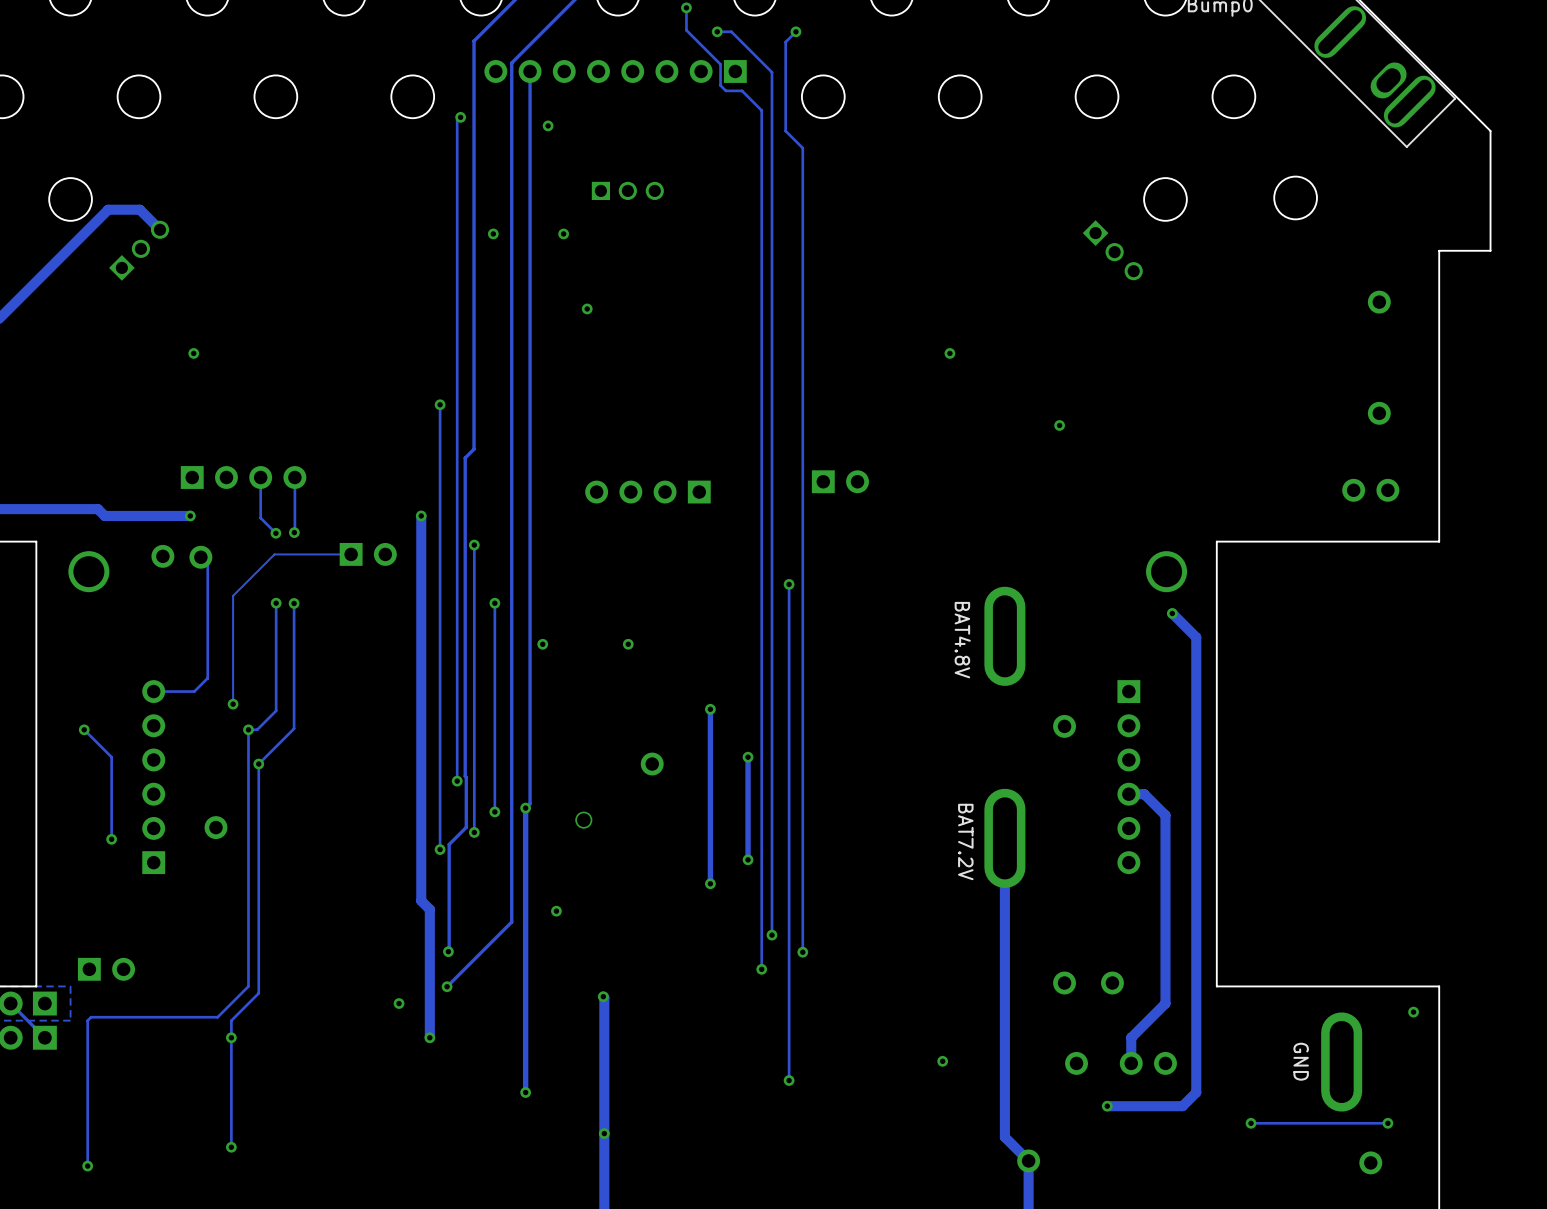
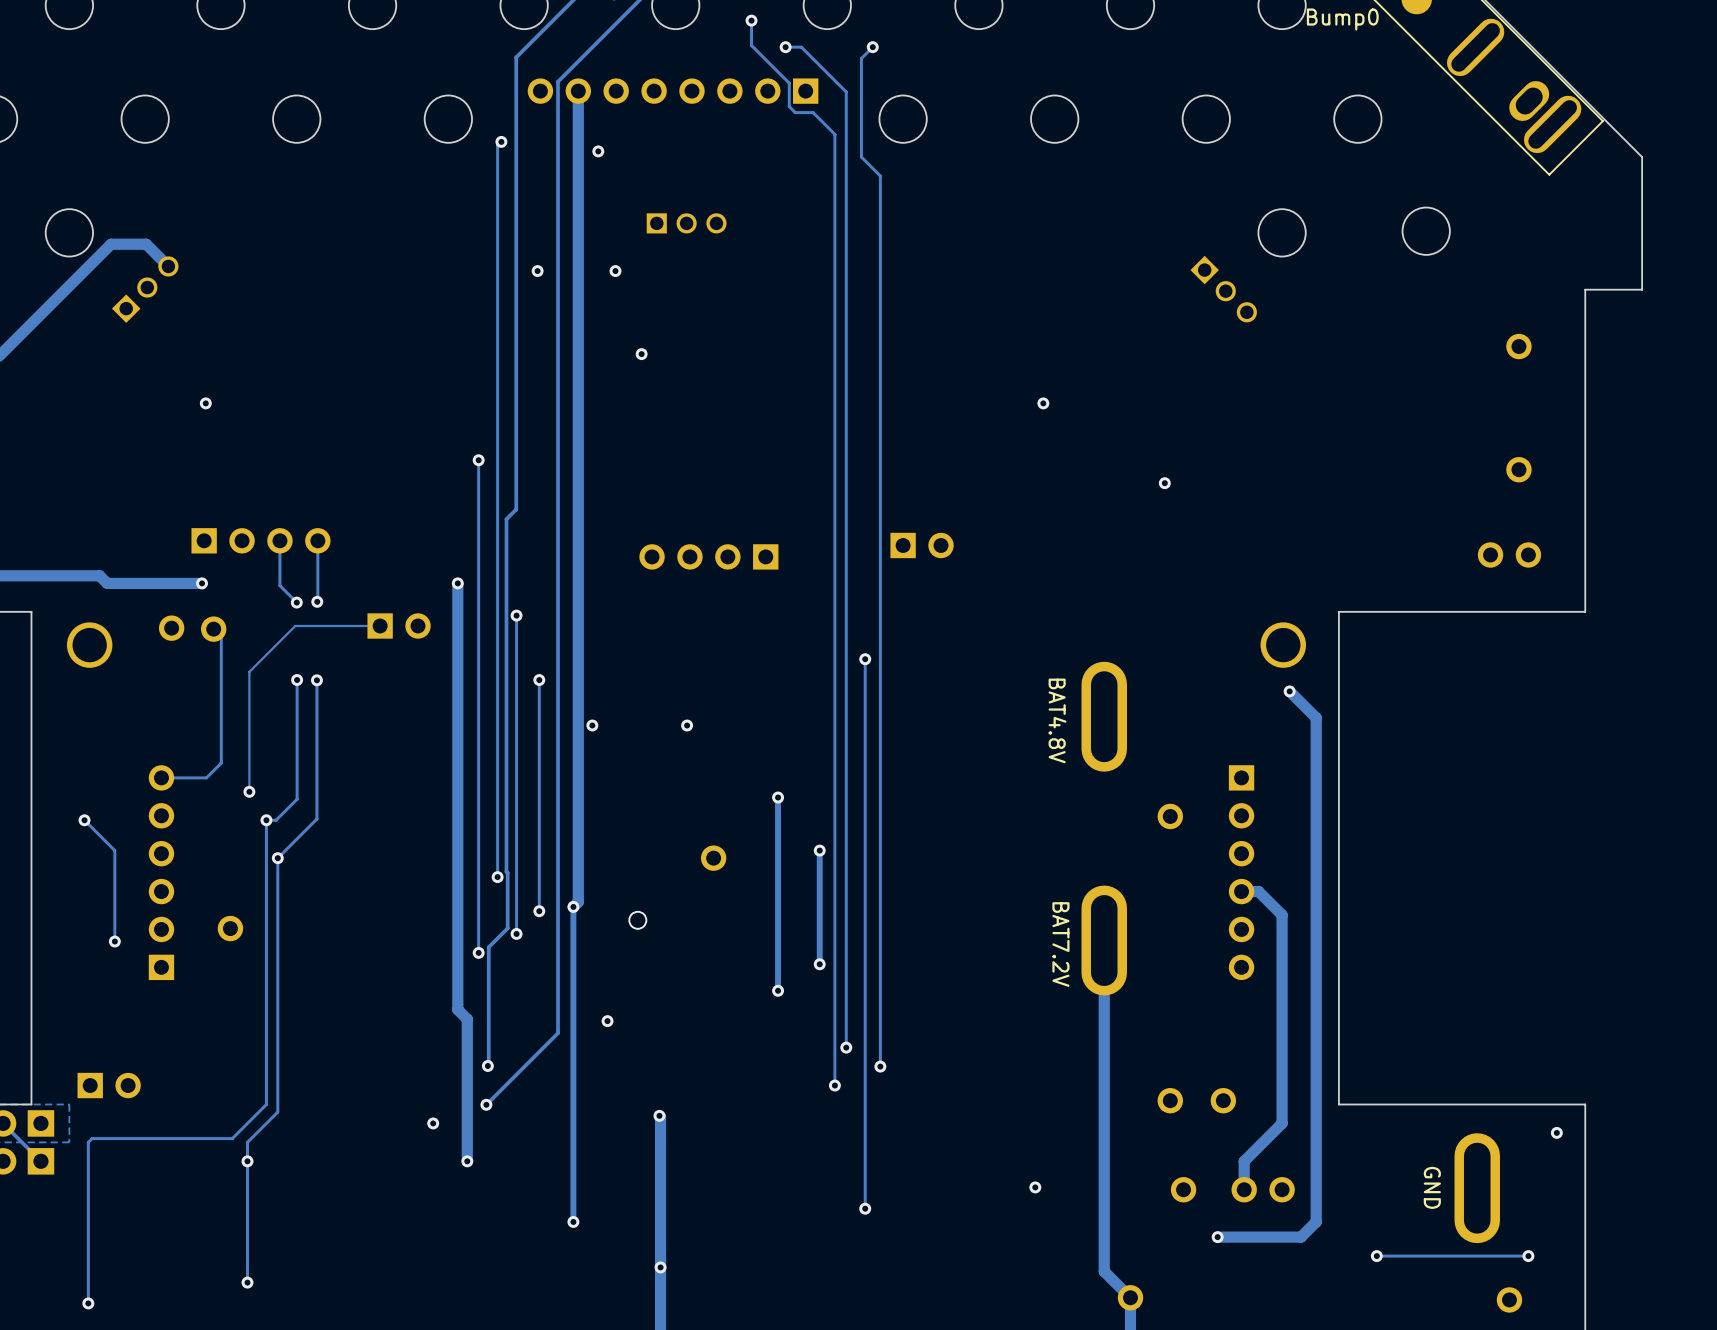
track width: thin (530, 71) (530, 803) (525, 808) -> thick (578, 91) (578, 902) (573, 906)

